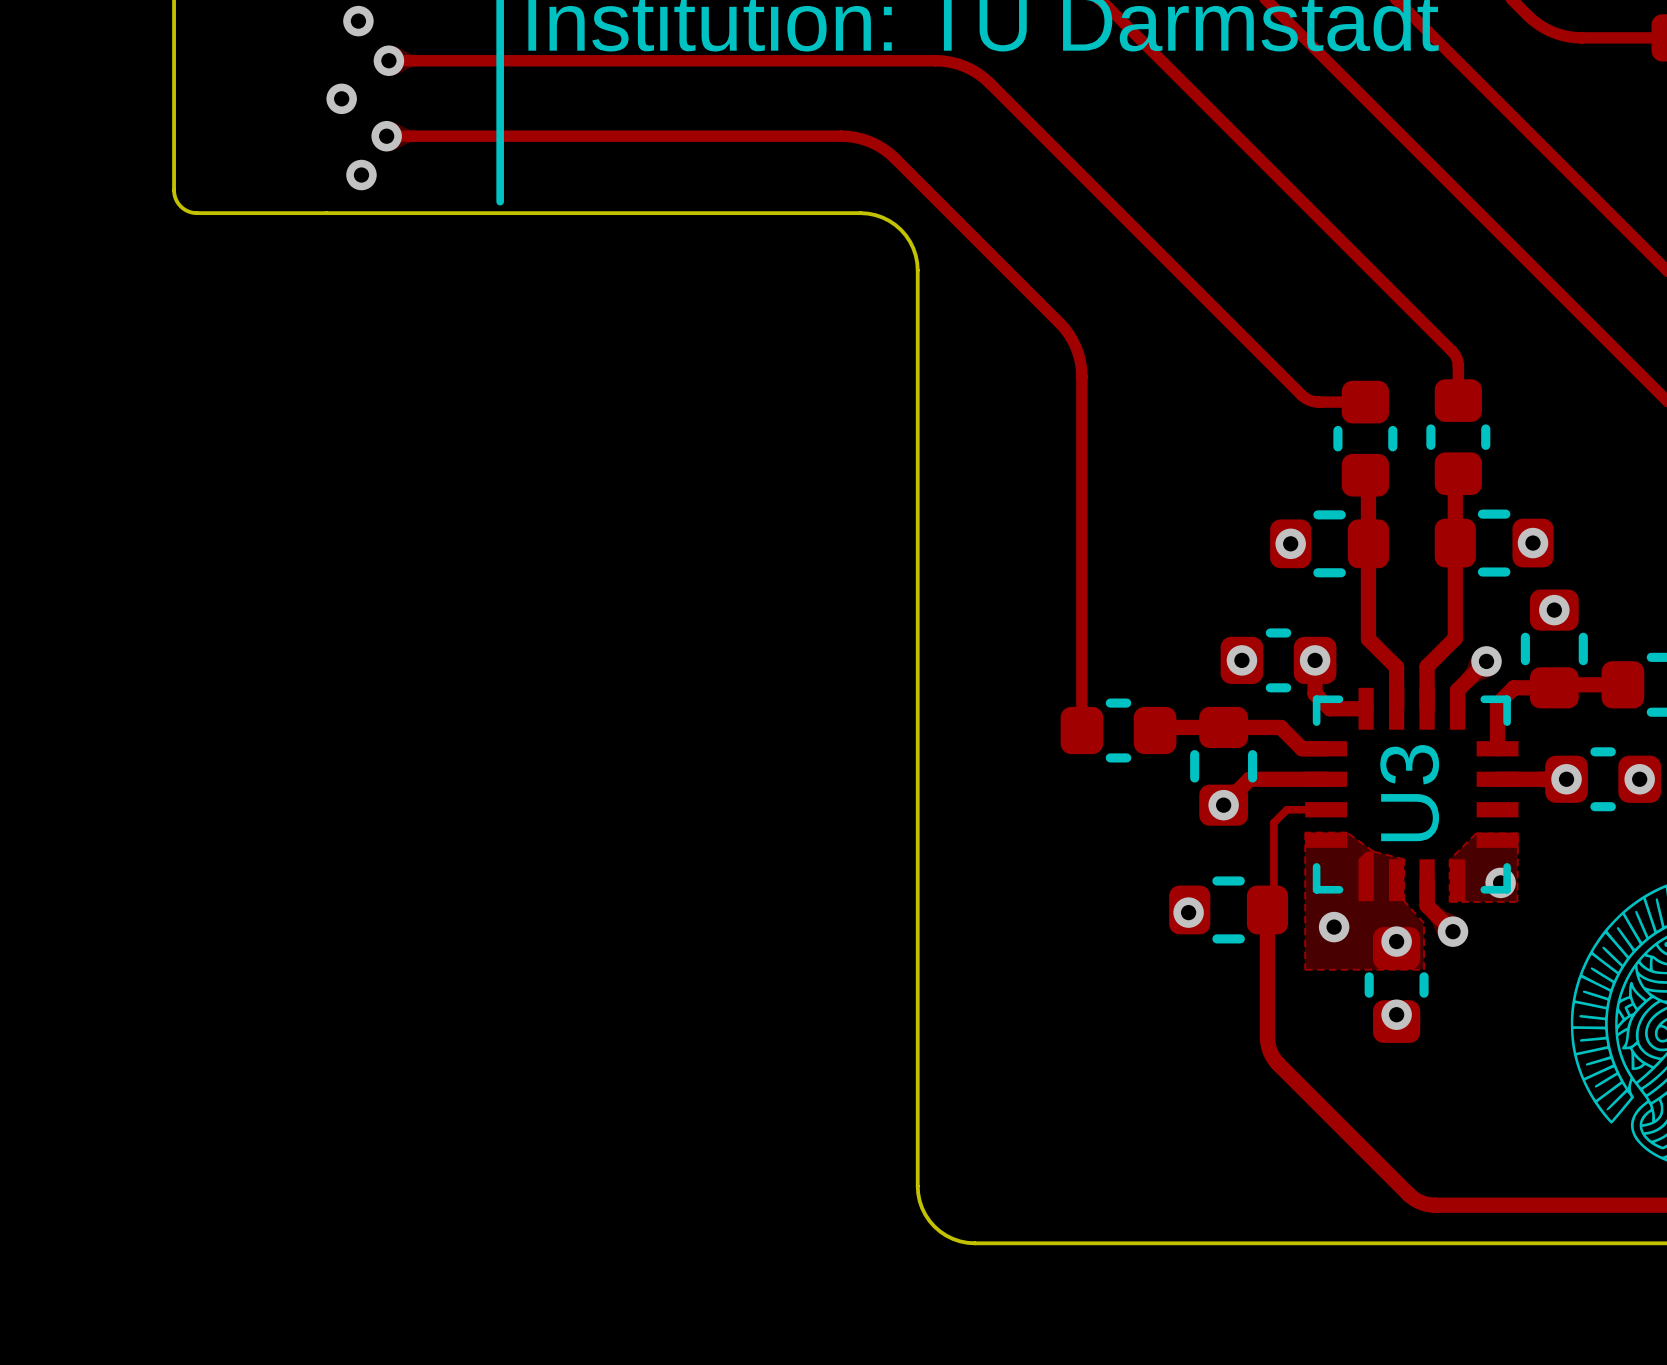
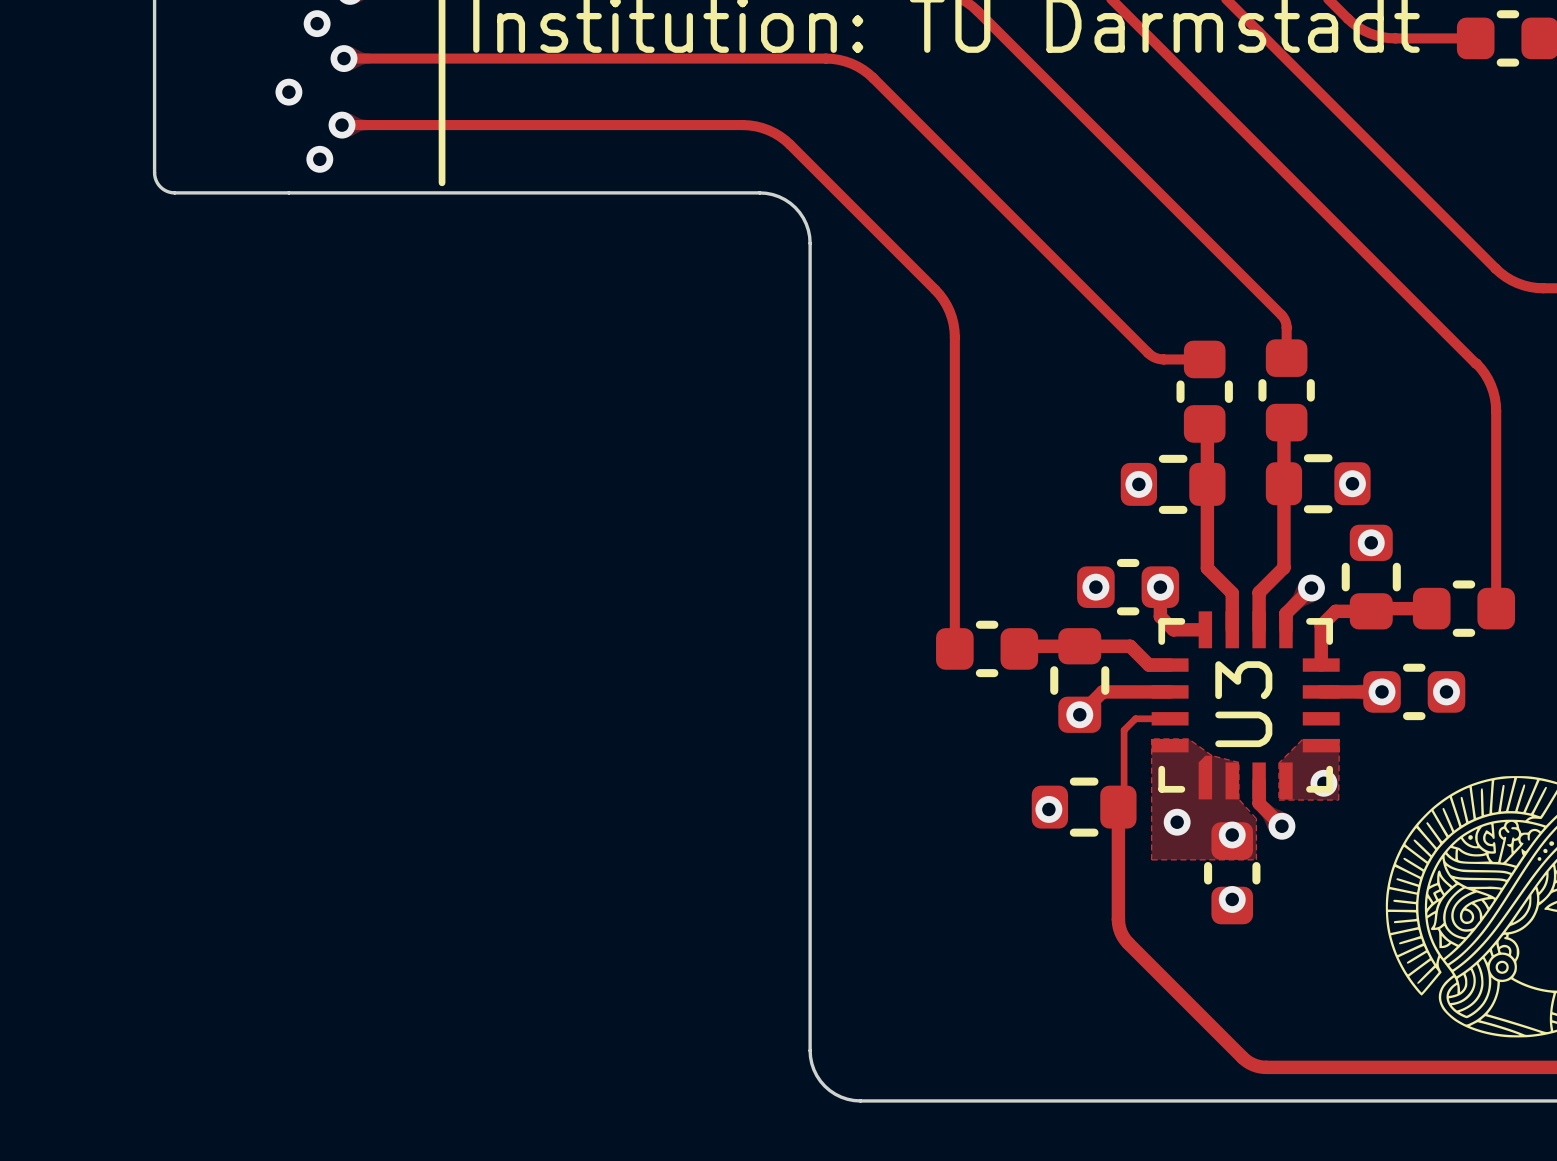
via position: (341, 98) -> (288, 92)

